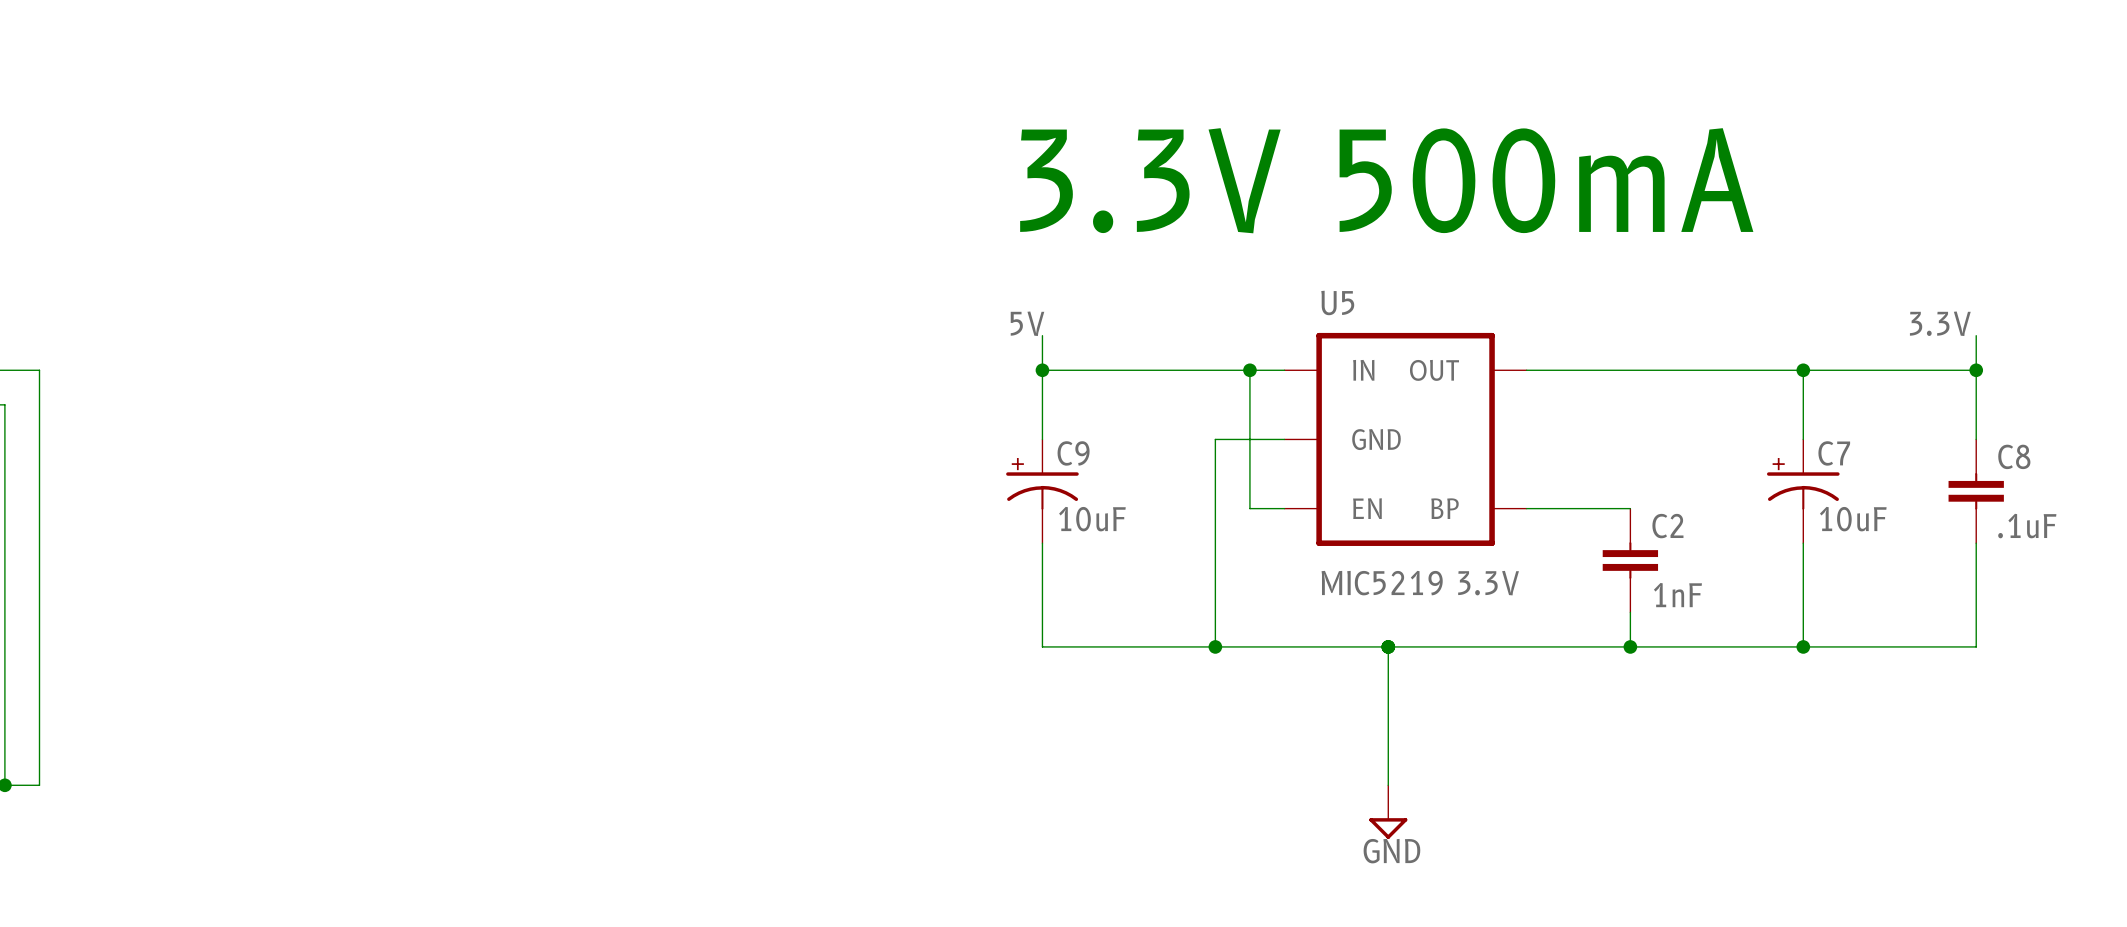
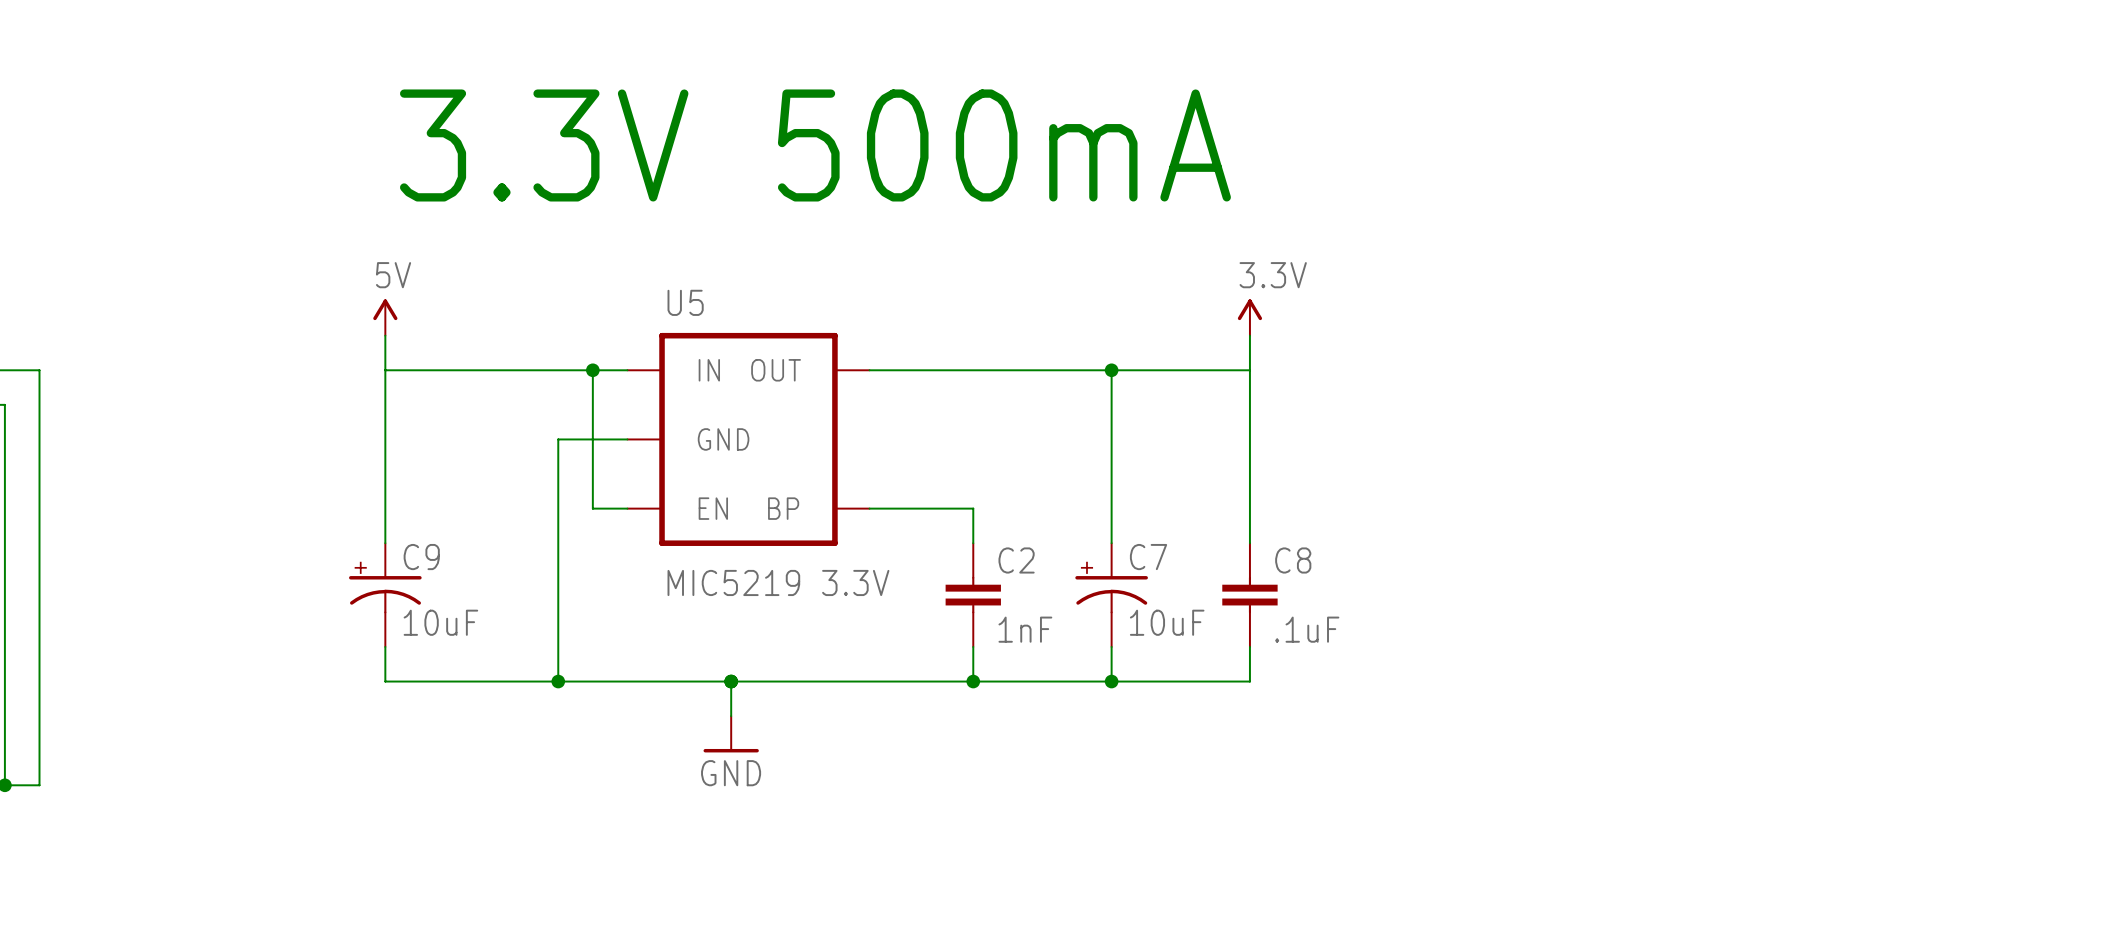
text: none -> 3.3V 500mA (815, 145)
text: 3.3V 500mA (1386, 180) -> none
power symbol: none -> 5V (385, 317)
power symbol: none -> 3.3V (1249, 317)
label: 5V (1027, 323) -> none
label: 3.3V (1940, 323) -> none
wire: none -> (385, 335) (385, 543)
wire: (1042, 335) (1042, 439) -> none
wire: (1976, 335) (1976, 439) -> none
wire: none -> (385, 370) (627, 370)
wire: none -> (592, 370) (592, 508) (627, 508)
junction: none -> (592, 370)
wire: none -> (869, 370) (1042, 370)
junction: (1042, 370) -> none
wire: none -> (1111, 370) (1111, 543)
junction: none -> (1111, 370)
wire: (1249, 370) (1284, 370) -> (1249, 370) (1249, 335)
junction: (1249, 370) -> none
wire: (1526, 370) (1976, 370) -> none
wire: (1803, 370) (1803, 439) -> none
junction: (1803, 370) -> none
junction: (1976, 370) -> none
wire: none -> (627, 439) (558, 439) (558, 681)
wire: (1284, 439) (1215, 439) (1215, 646) -> none
U5 position: (1405, 439) -> (748, 439)
C9 position: (1042, 491) -> (385, 595)
C7 position: (1803, 491) -> (1111, 595)
C8 position: (1976, 491) -> (1249, 595)
wire: none -> (869, 508) (973, 508) (973, 543)
wire: (1249, 508) (1284, 508) -> (1249, 508) (1249, 543)
wire: (1526, 508) (1630, 508) -> none
wire: (1042, 543) (1042, 646) (1976, 646) (1976, 543) -> none
wire: (1803, 543) (1803, 646) -> none
C2 position: (1630, 560) -> (973, 595)
wire: (1630, 612) (1630, 646) -> none
wire: none -> (385, 646) (385, 681) (1249, 681) (1249, 646)
wire: none -> (973, 646) (973, 681)
wire: none -> (1111, 646) (1111, 681)
junction: (1215, 646) -> none
wire: (1388, 646) (1388, 785) -> none
junction: (1388, 646) -> none
junction: (1630, 646) -> none
junction: (1803, 646) -> none
junction: none -> (558, 681)
wire: none -> (731, 681) (731, 716)
junction: none -> (731, 681)
junction: none -> (973, 681)
junction: none -> (1111, 681)
power symbol: none -> GND (731, 734)
power symbol: GND (1388, 812) -> none

